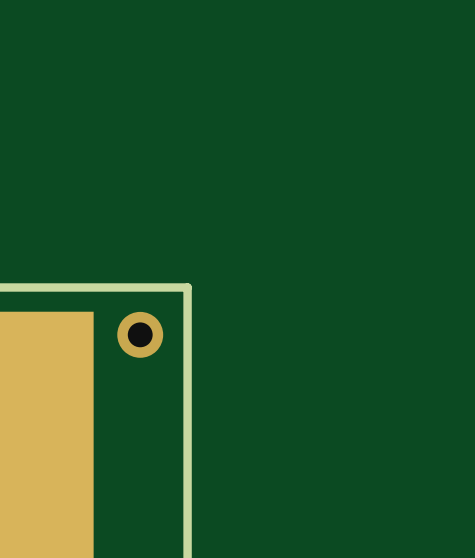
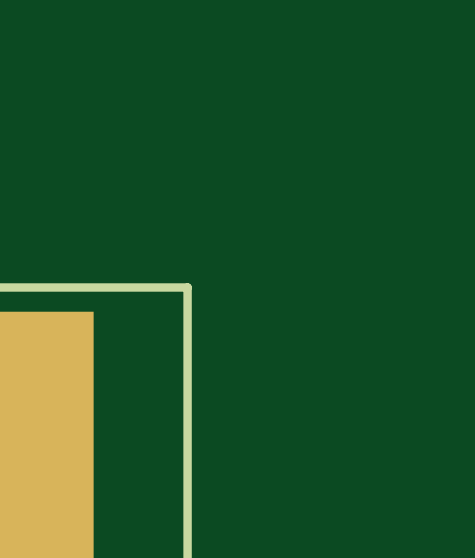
via: (140, 334) -> none

